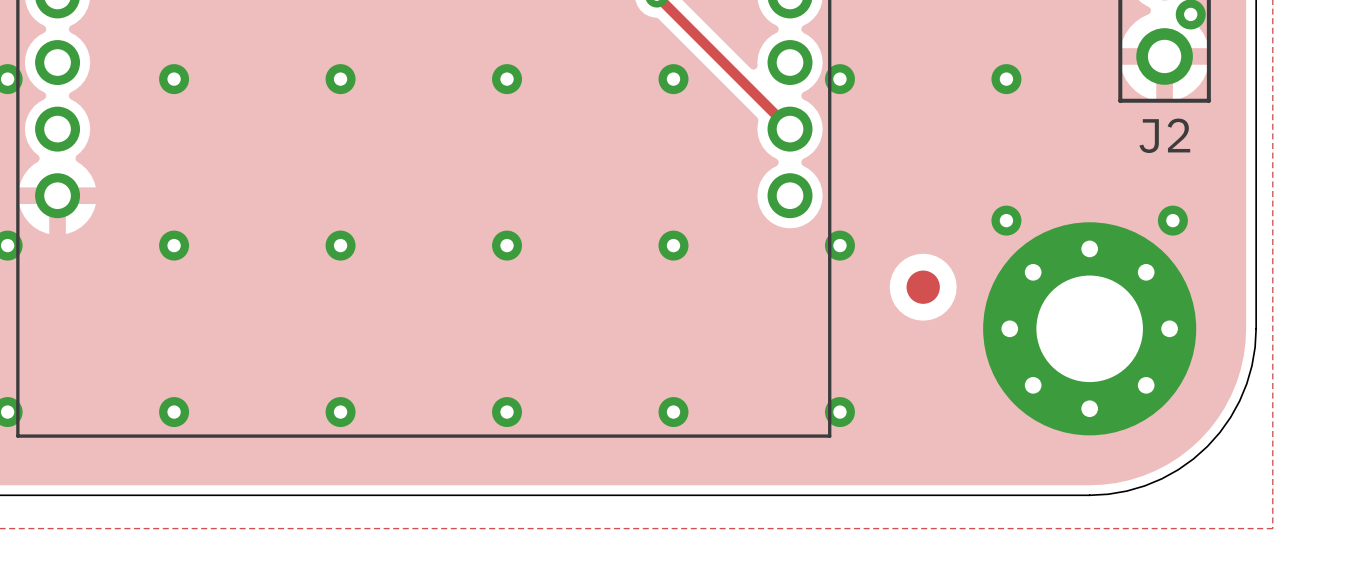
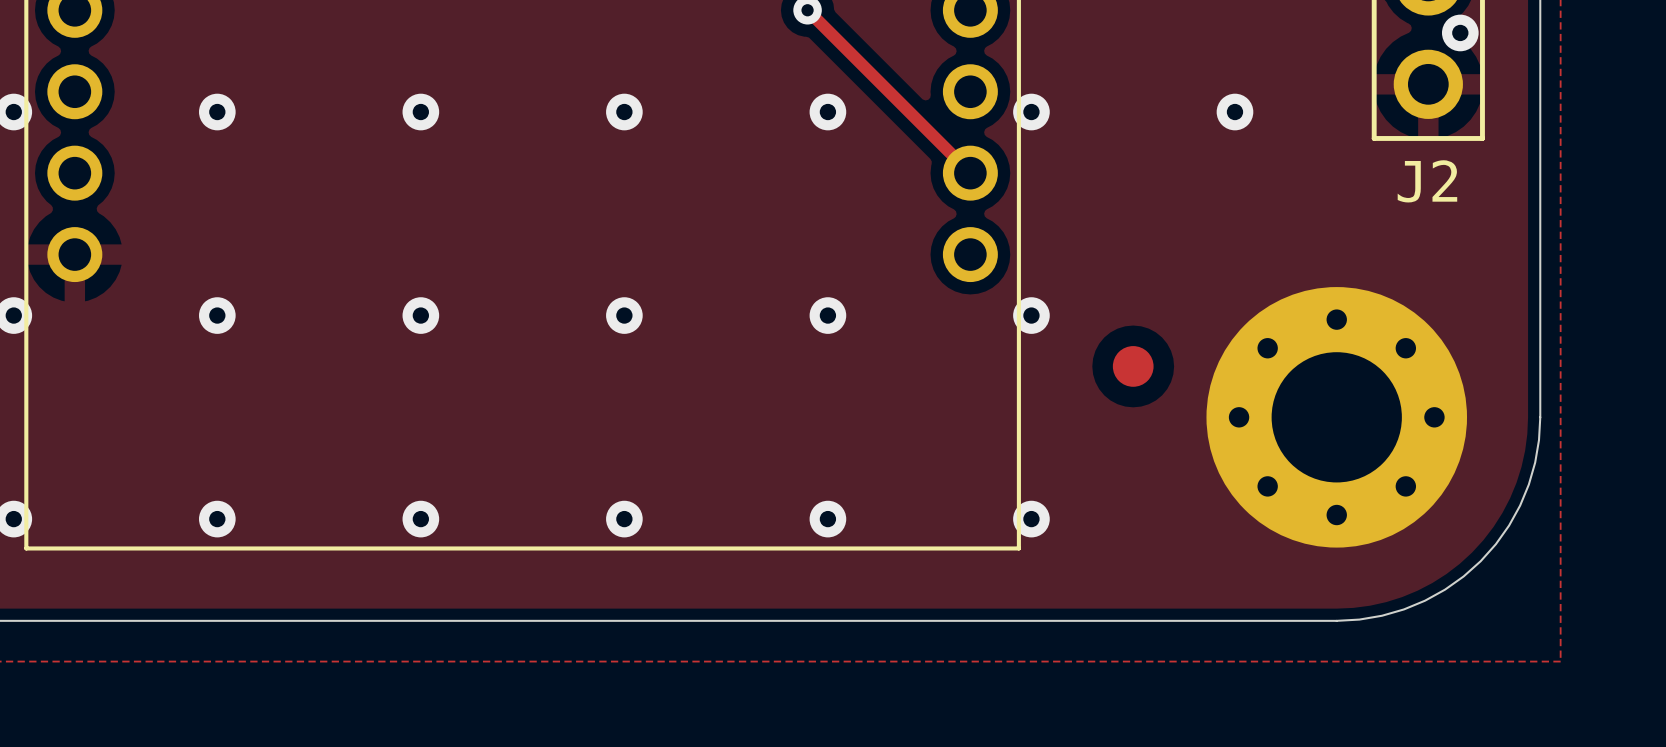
via: (1006, 220) -> none
via: (1172, 220) -> none

